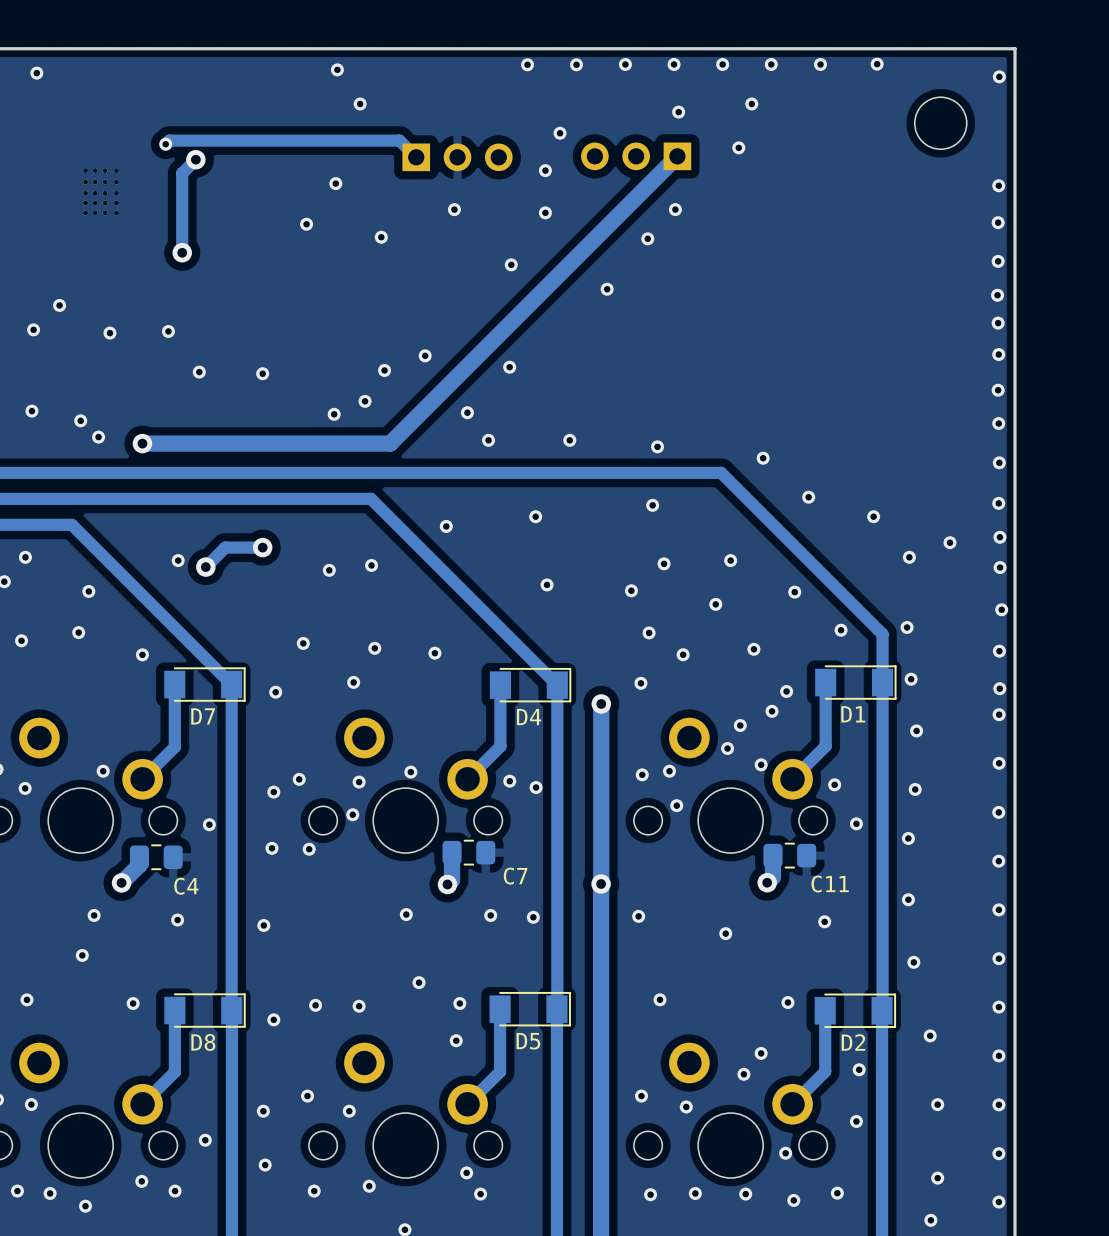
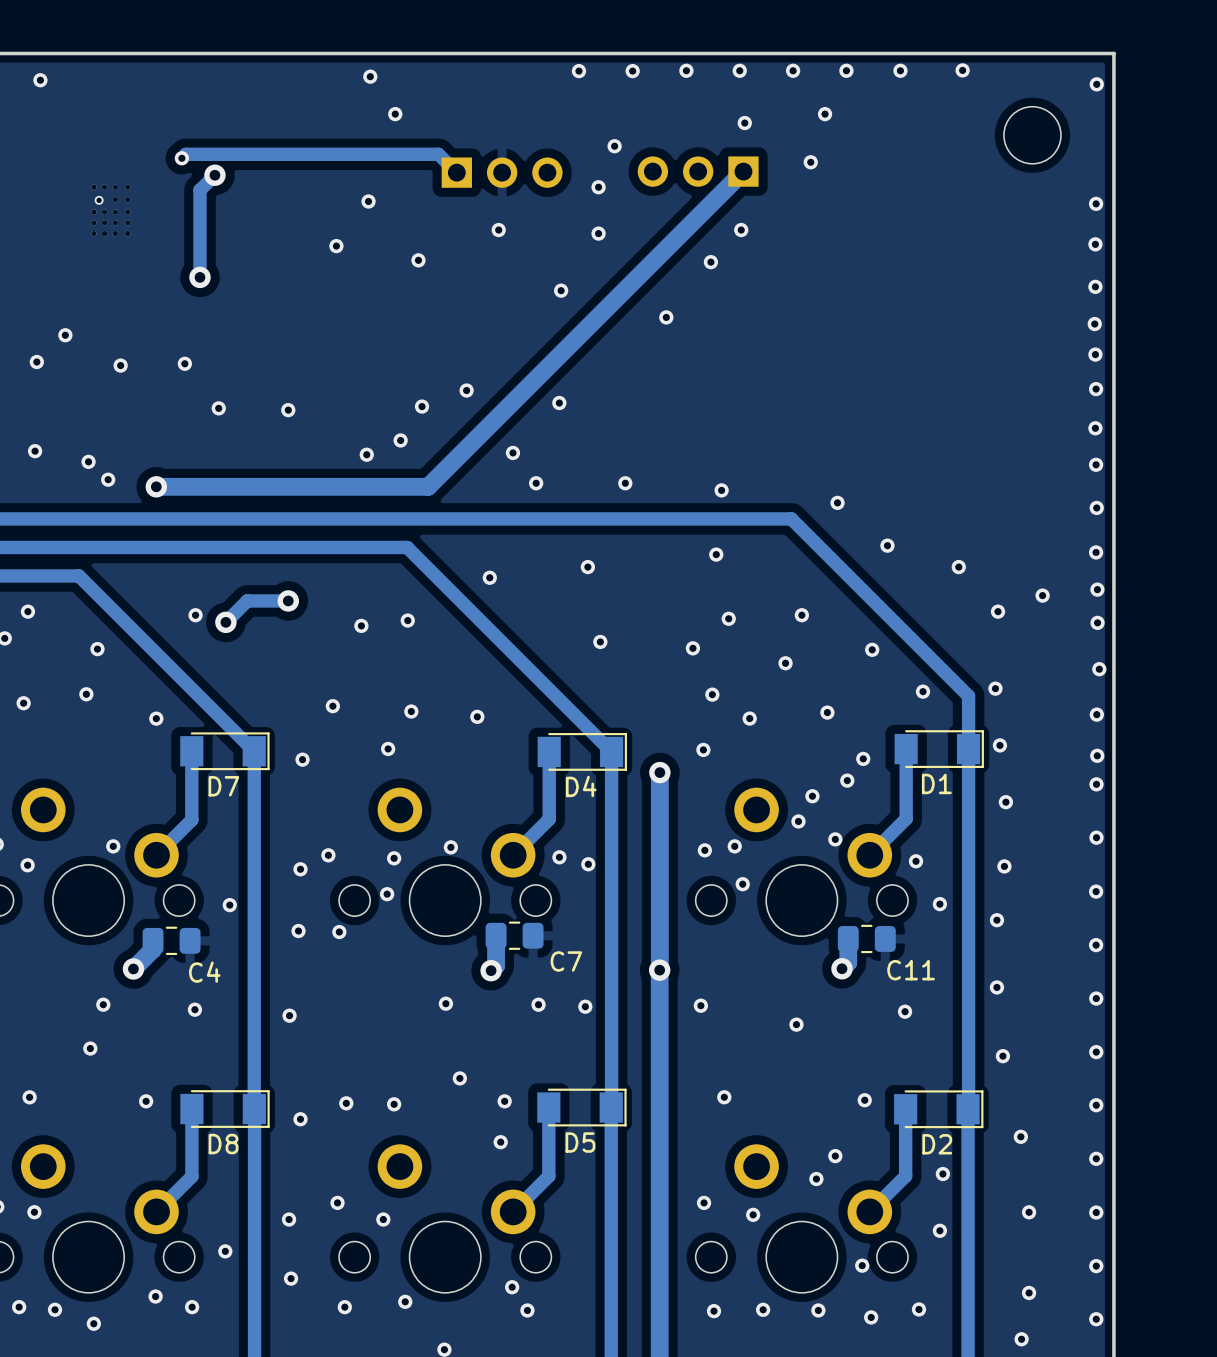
via: (85, 181) -> none
via: (95, 181) -> none
via: none -> (99, 200)

